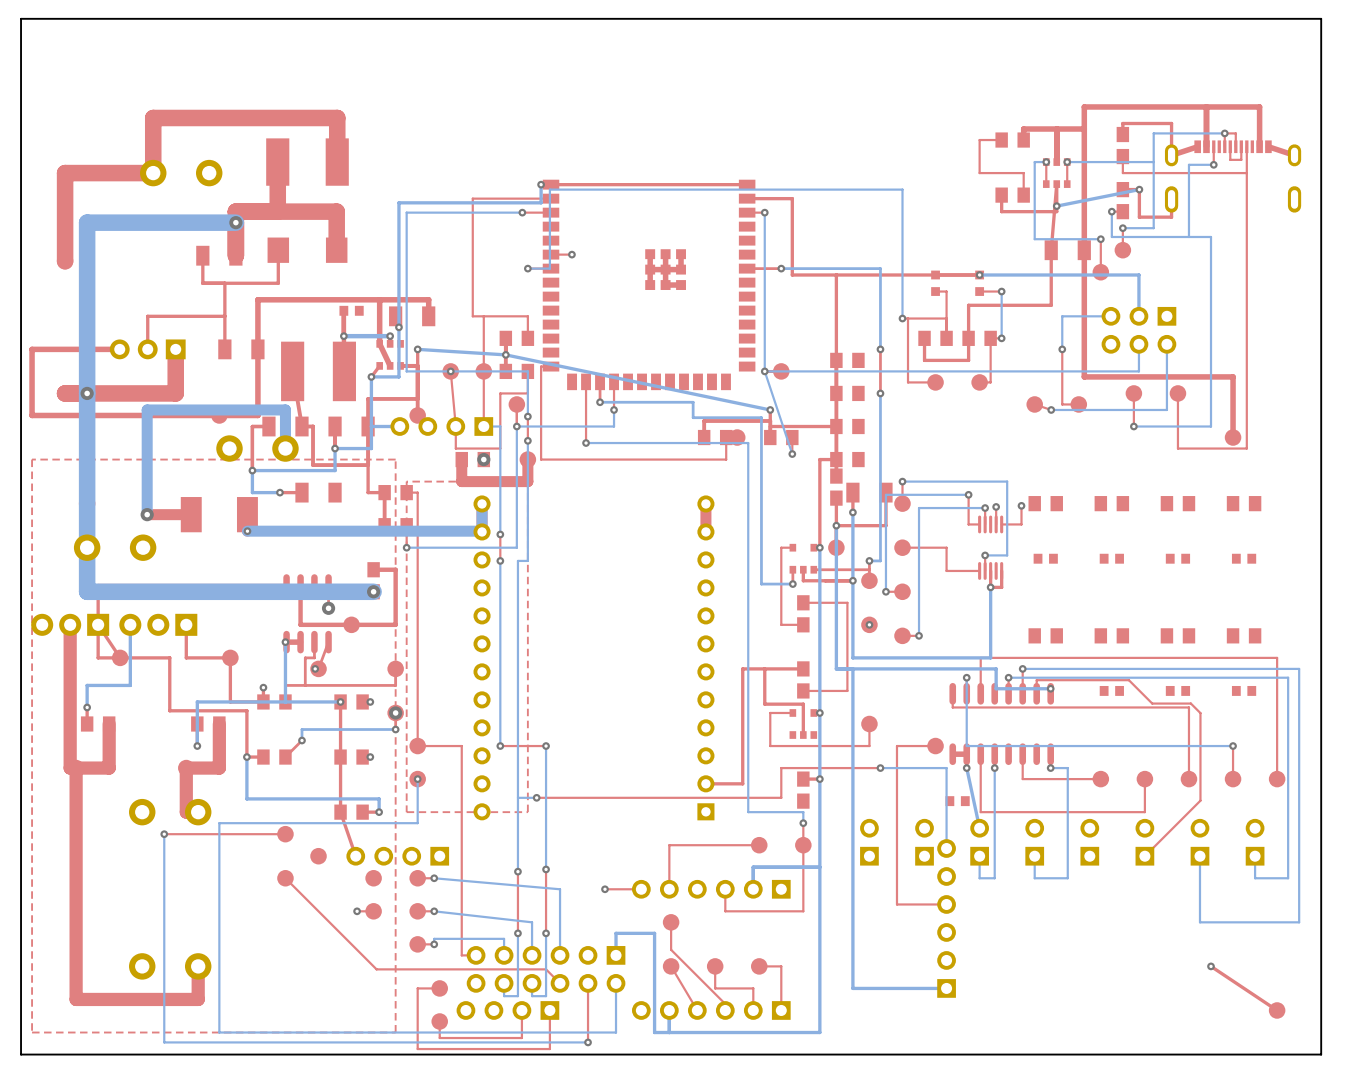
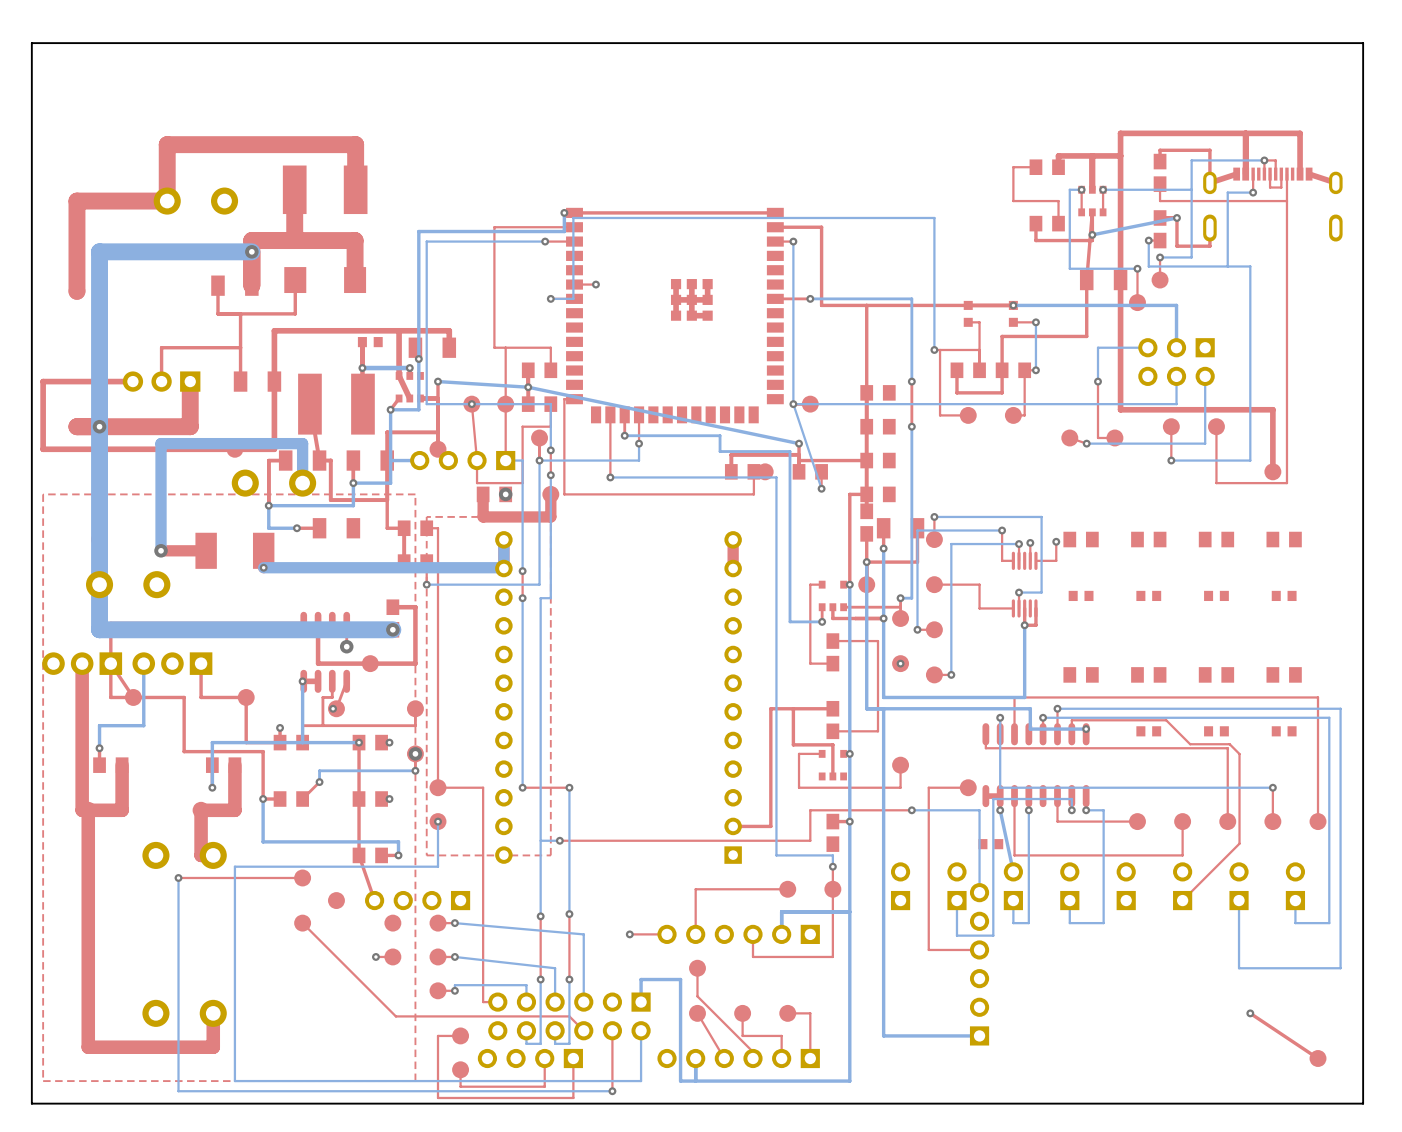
bottom track: none -> (1071, 810) (1071, 799) (993, 799) (993, 935) (956, 935) (956, 900)
via: none -> (1071, 810)

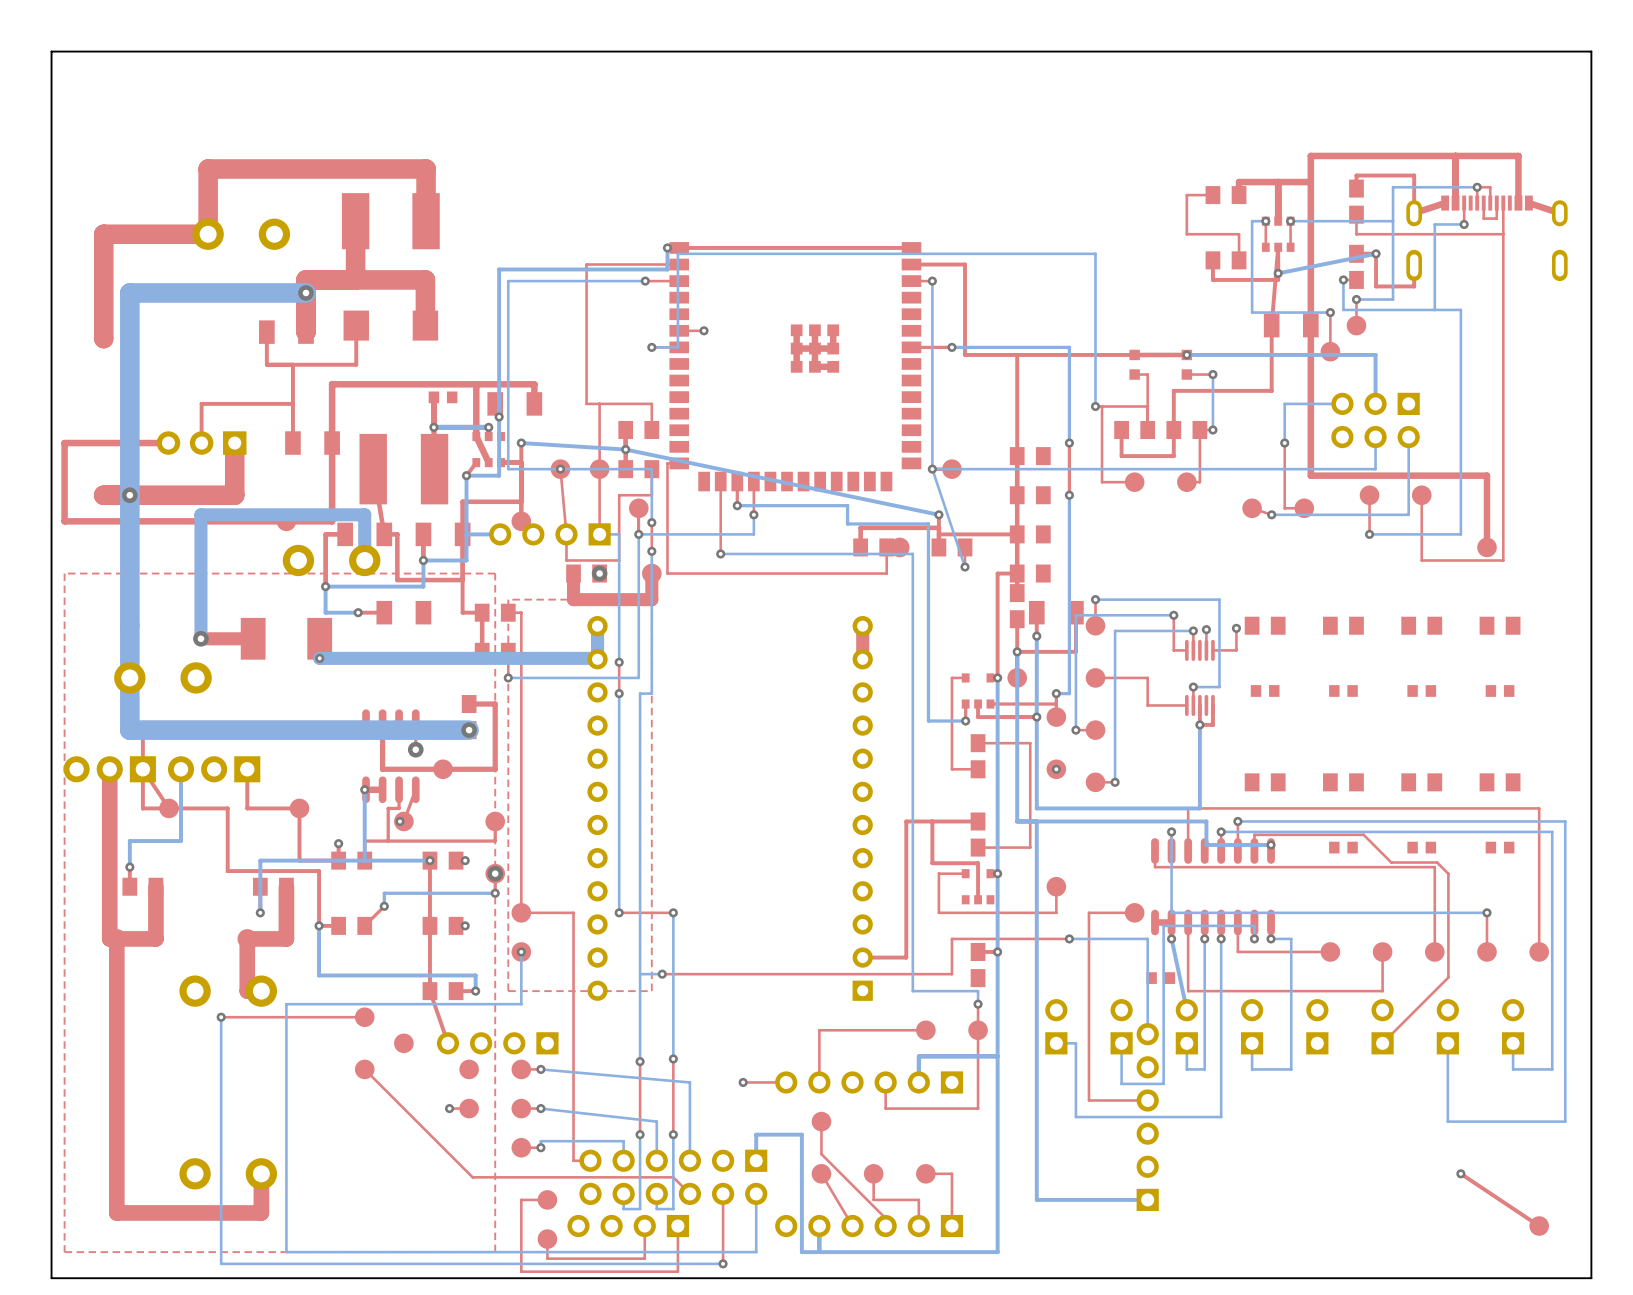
bottom track: none -> (1221, 938) (1221, 1117) (1075, 1117) (1075, 1043) (1056, 1043)
via: none -> (1221, 938)

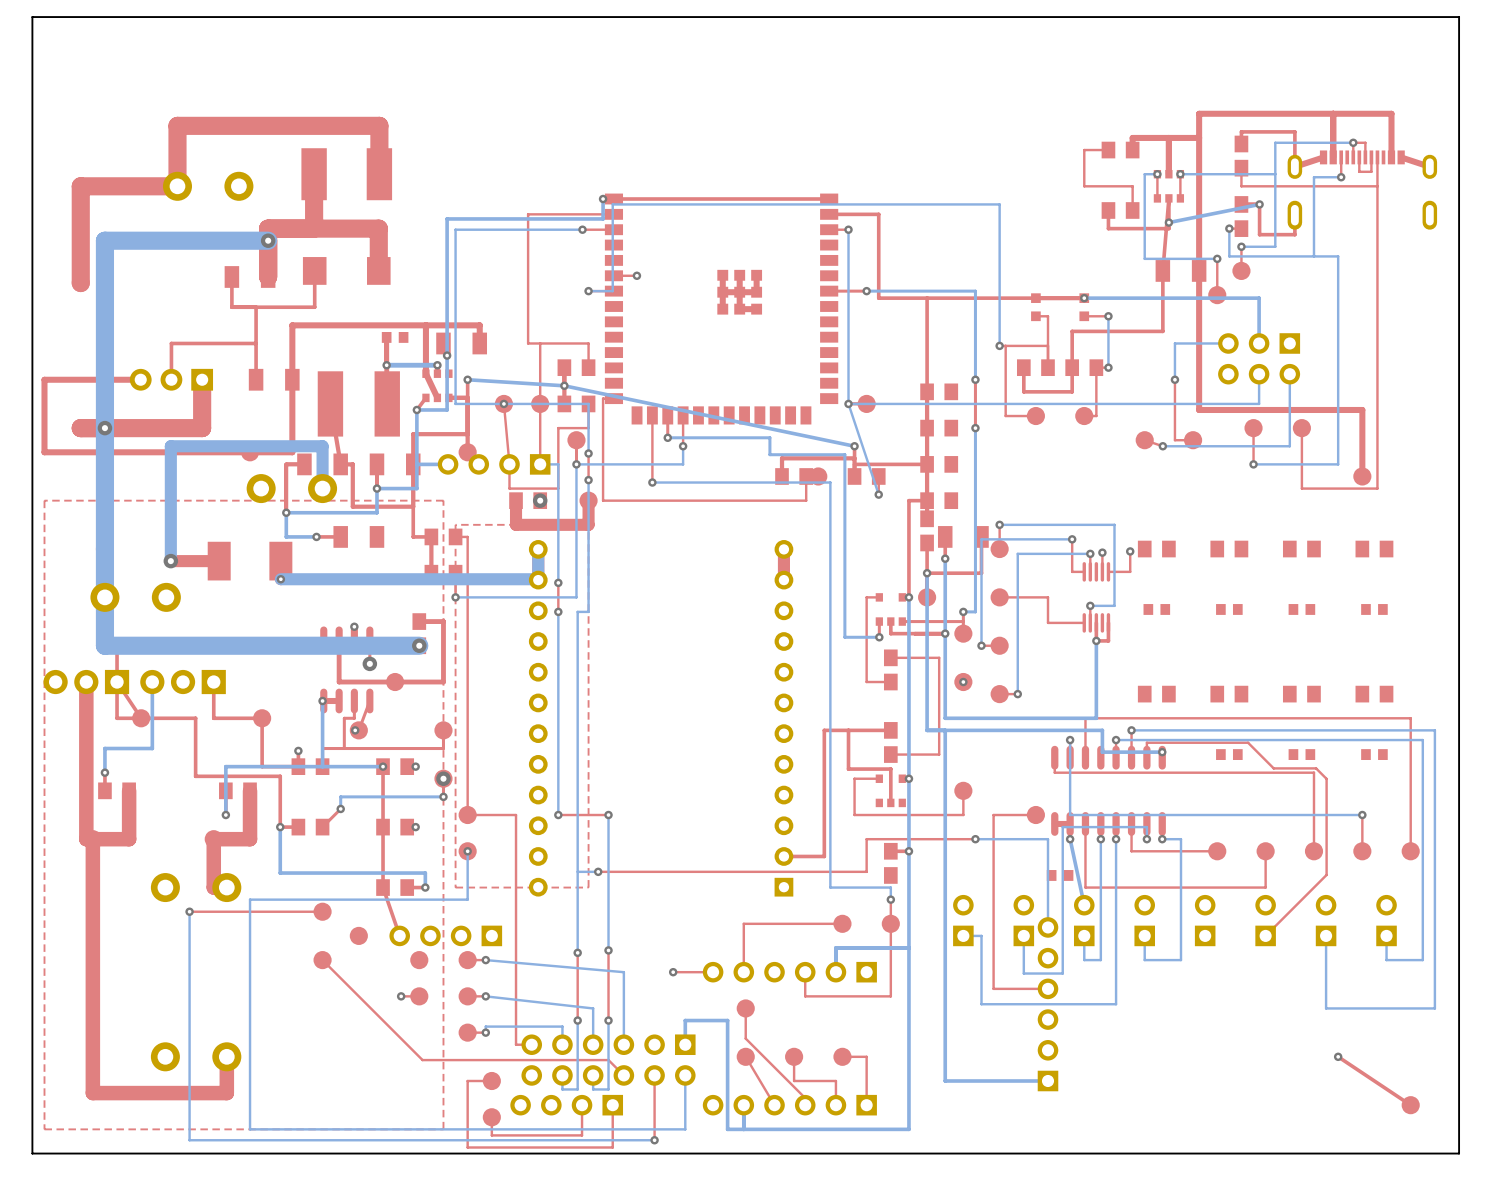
via: none -> (354, 626)

